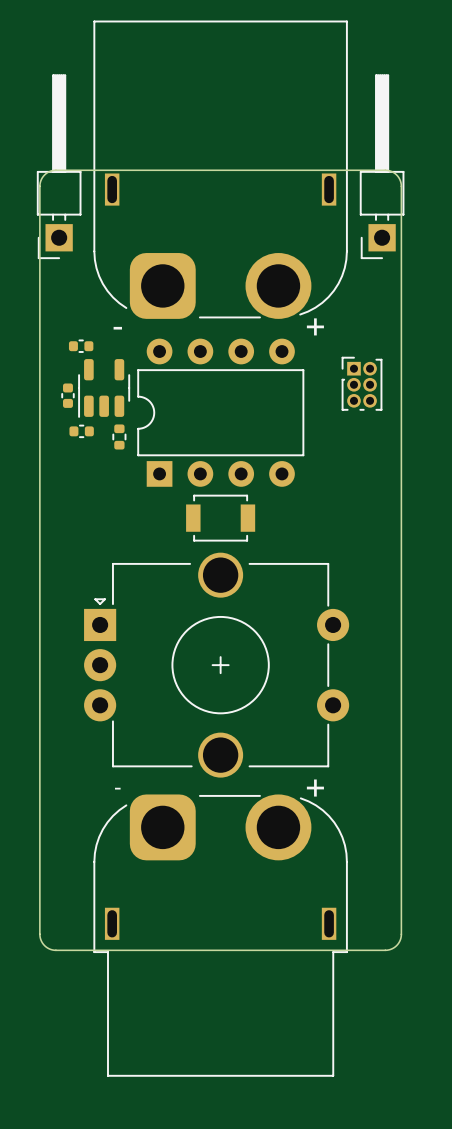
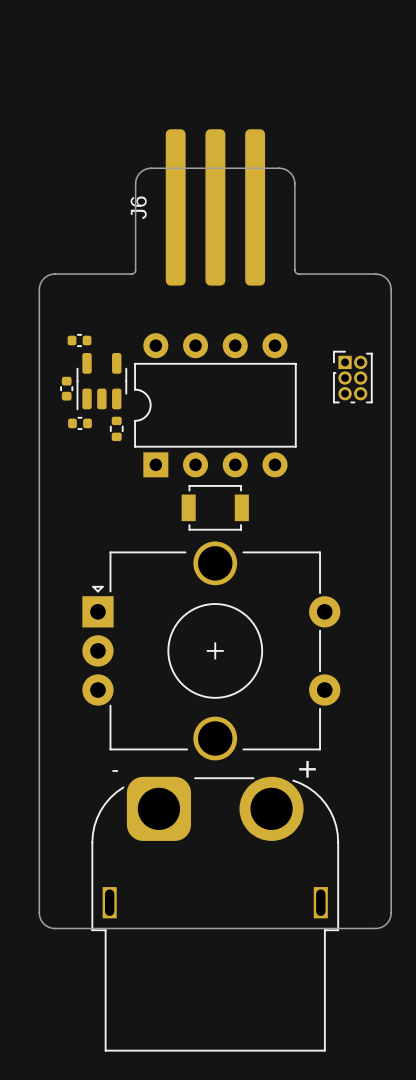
part: (59, 166) -> none
part: (382, 166) -> none
part: (220, 169) -> none
J6: none -> (215, 207)
board edge: (39, 293) (39, 184) (45, 173) (55, 170) (390, 171) (397, 176) (401, 184) (401, 293) -> (39, 289) (42, 279) (51, 274) (134, 272) (135, 182) (140, 172) (151, 168) (286, 169) (292, 175) (294, 182) (295, 272) (379, 274) (387, 279) (391, 289)

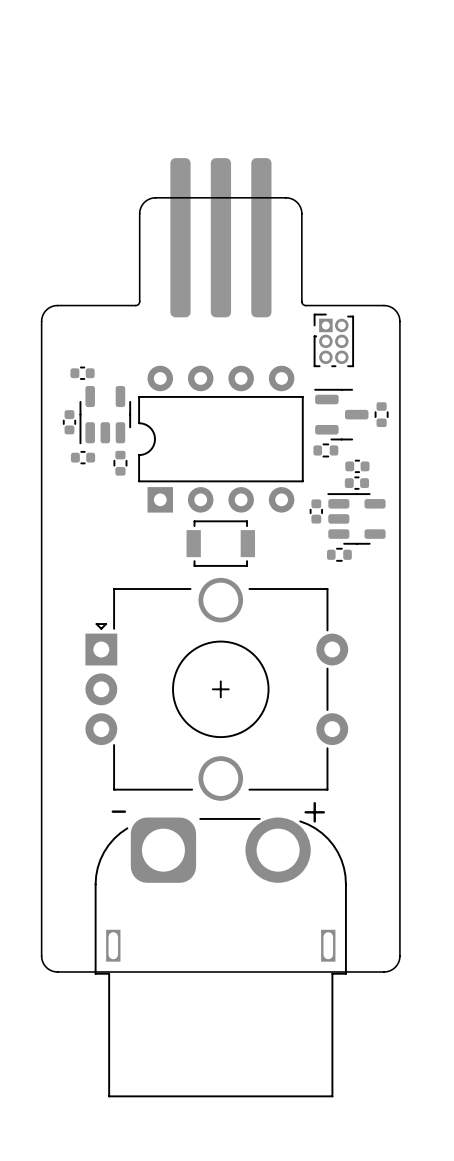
J6 name: J6 (138, 207) -> none
part position: (352, 377) -> (333, 340)
part: none -> (341, 414)
part: none -> (381, 414)
part: none -> (325, 450)
part: none -> (357, 466)
part: none -> (356, 483)
part: none -> (316, 511)
part: none -> (356, 518)
part: none -> (339, 554)

